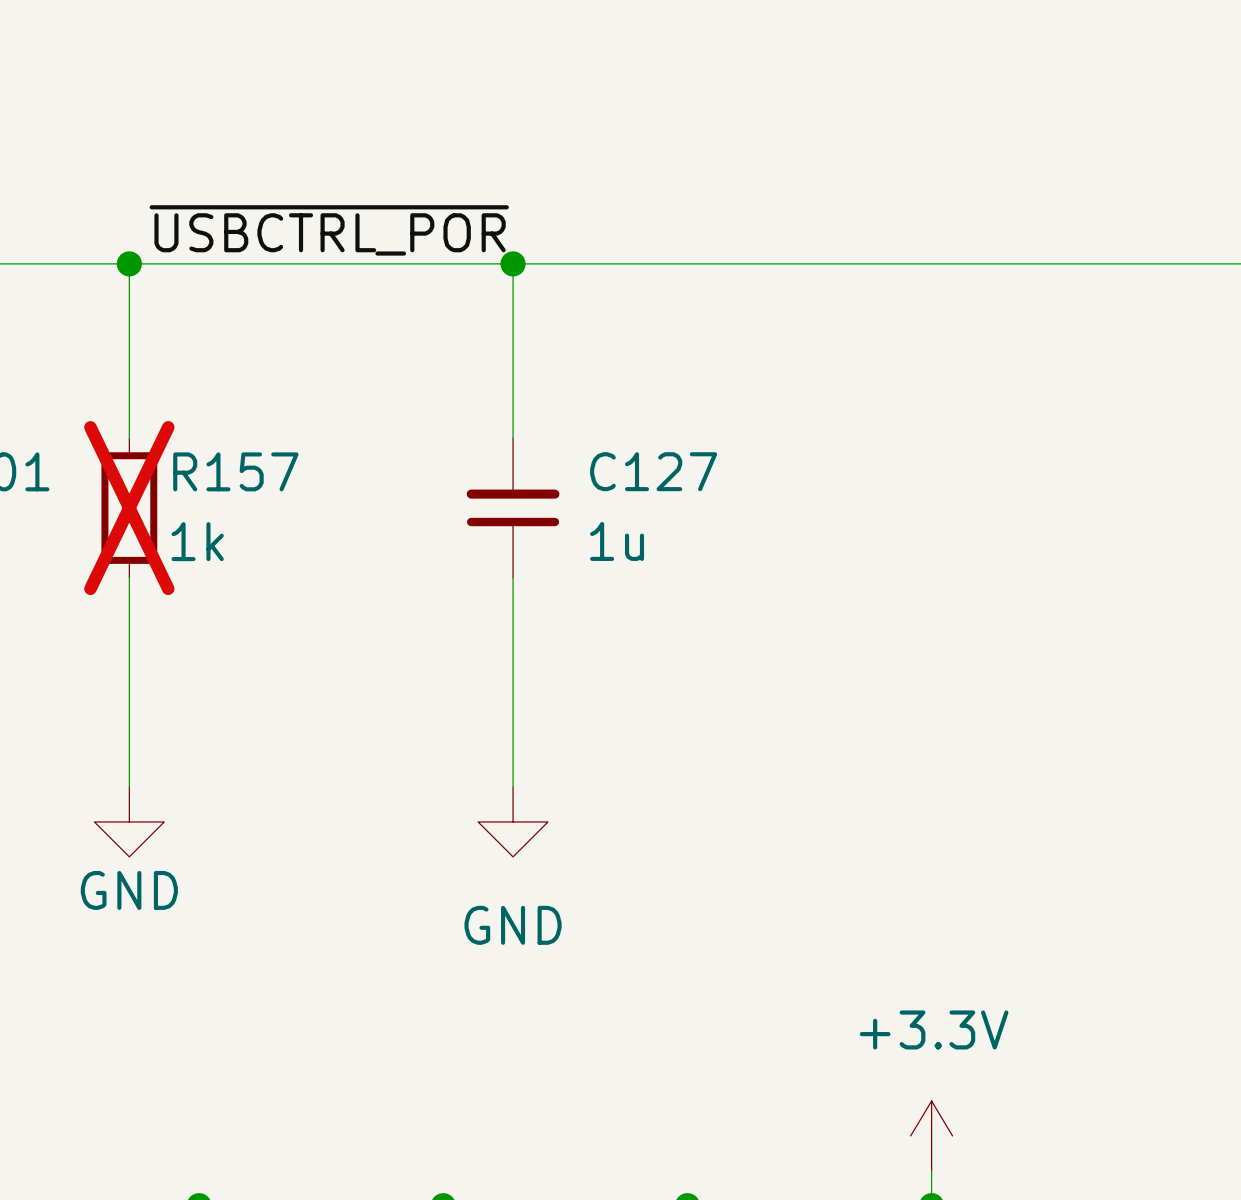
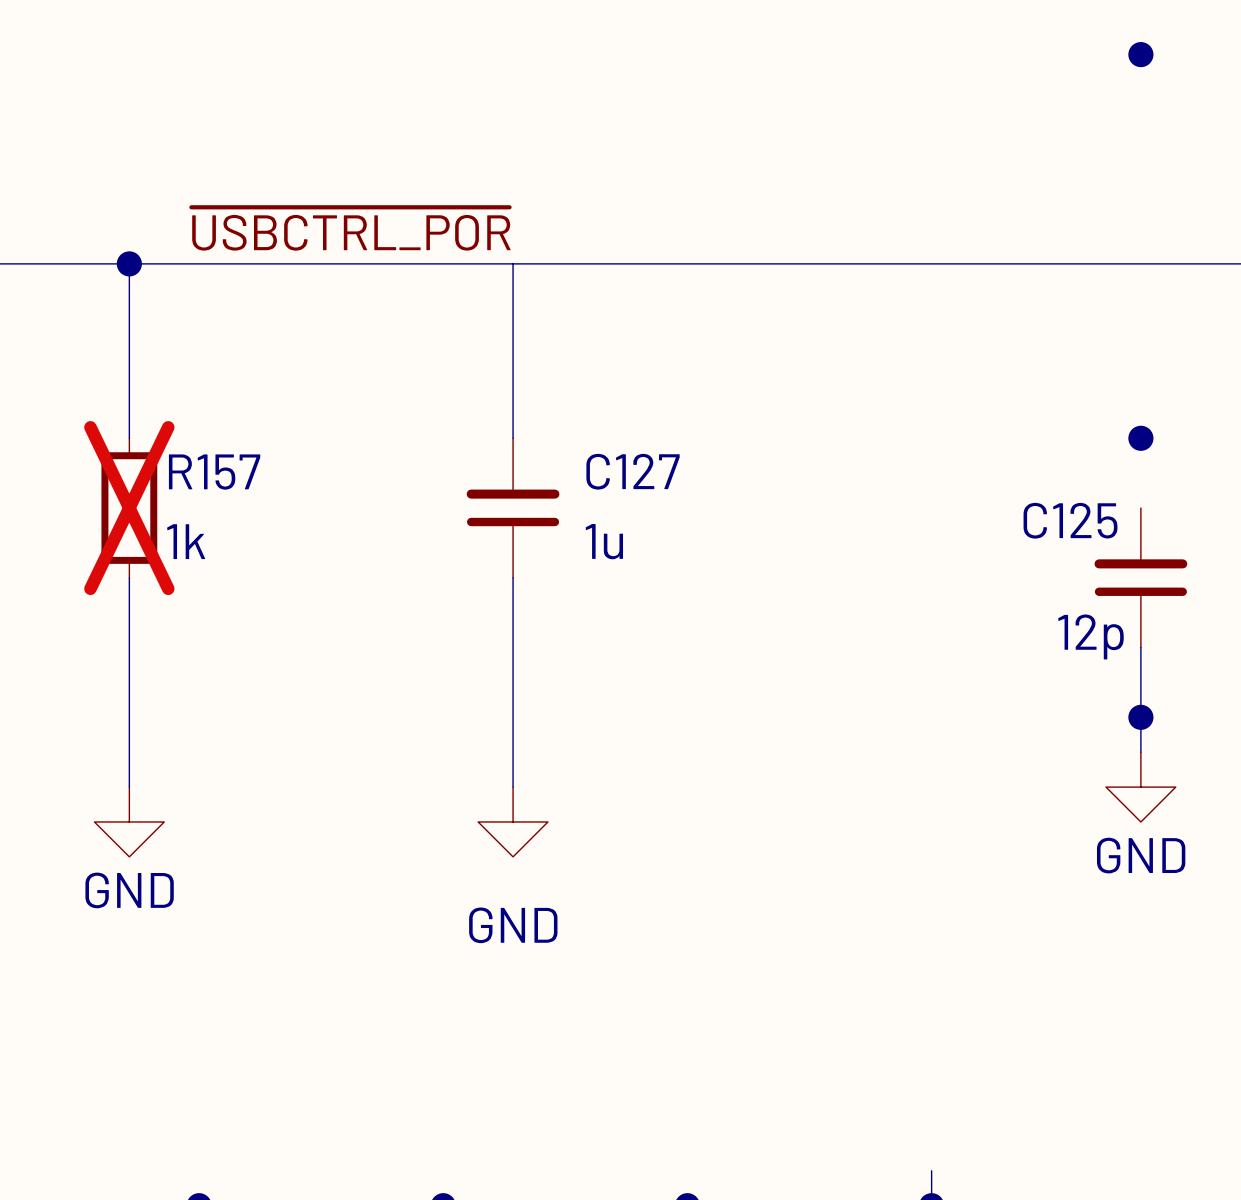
junction: none -> (1140, 54)
junction: (513, 263) -> none
junction: none -> (1140, 438)
C125: none -> (1140, 577)
wire: none -> (1140, 647) (1140, 752)
junction: none -> (1140, 717)
power symbol: none -> GND (1140, 787)
power symbol: +3.3V (931, 1135) -> none

